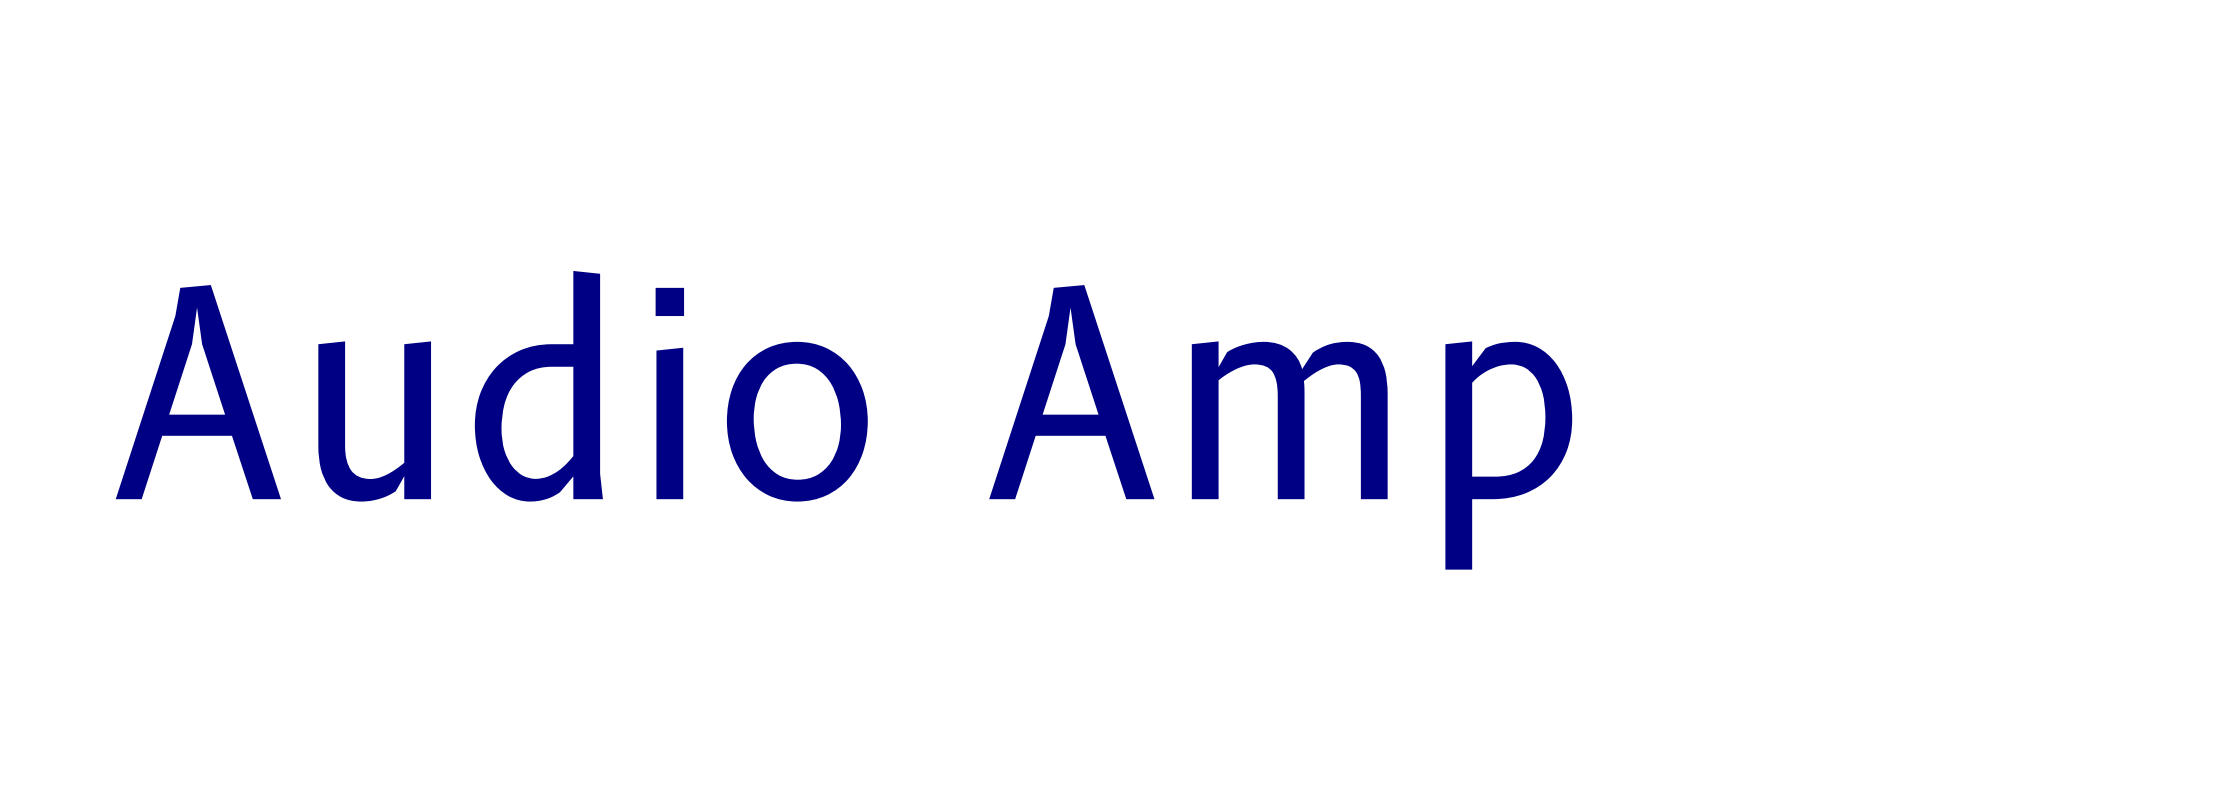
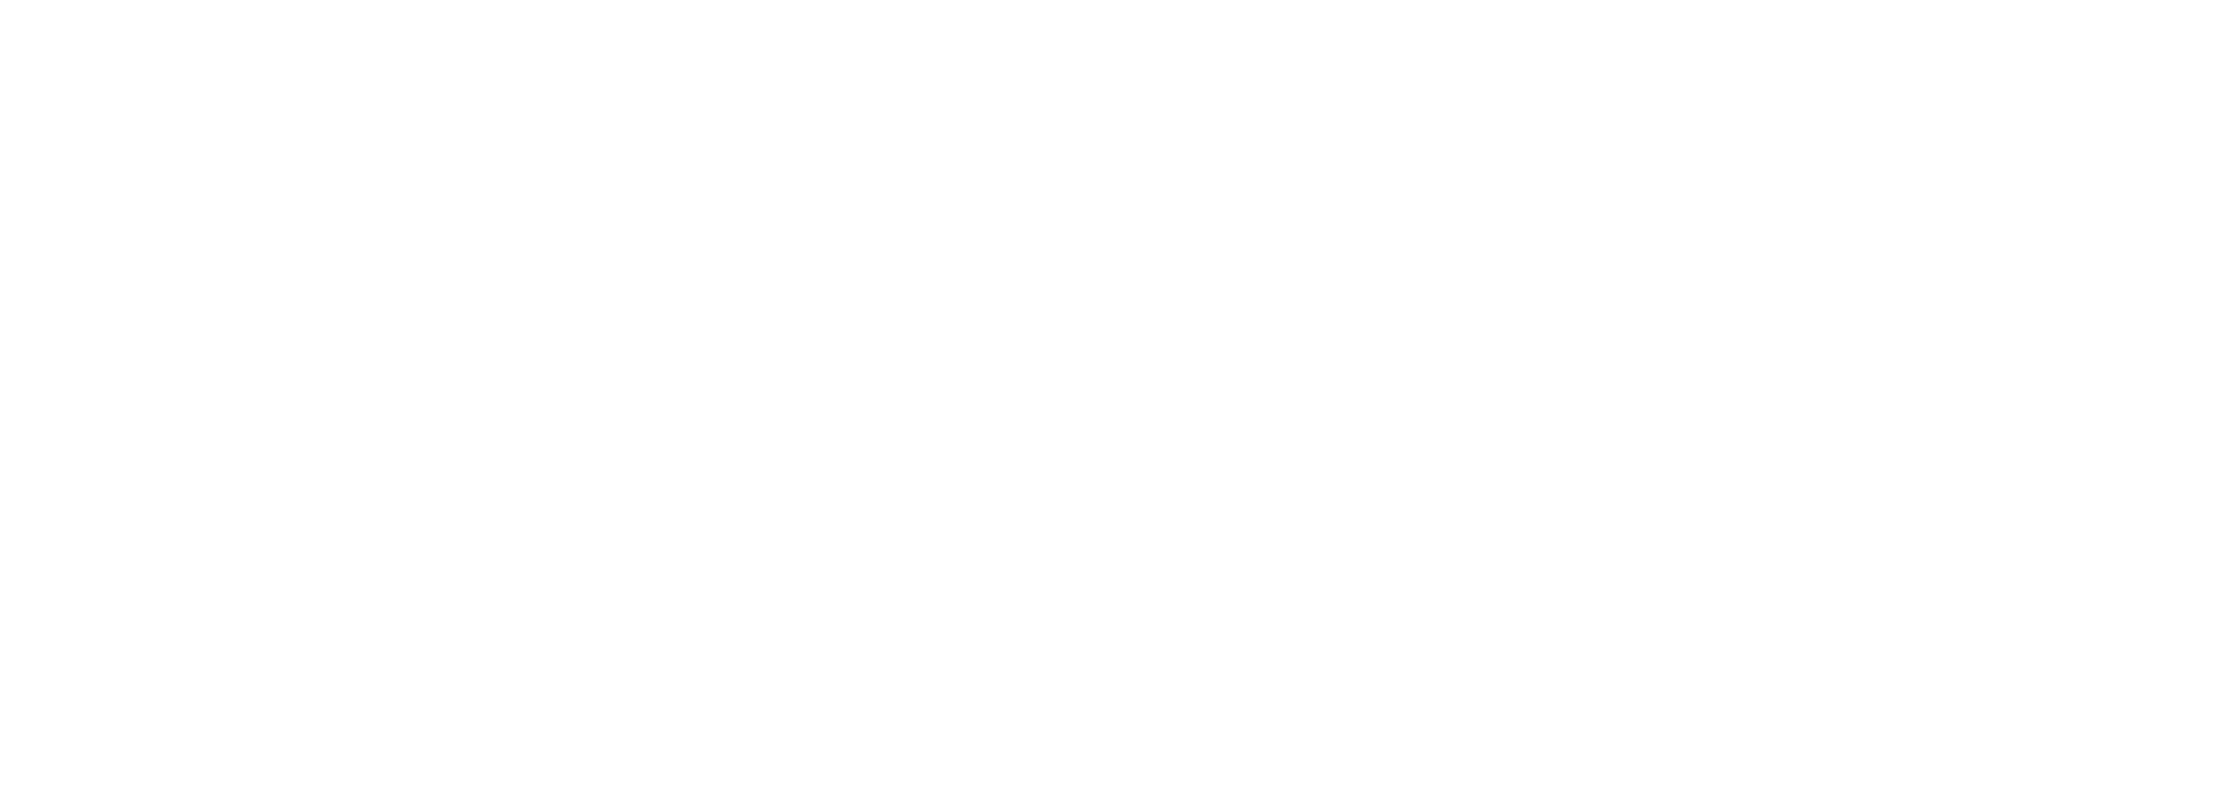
text: Audio Amp (843, 420) -> none

